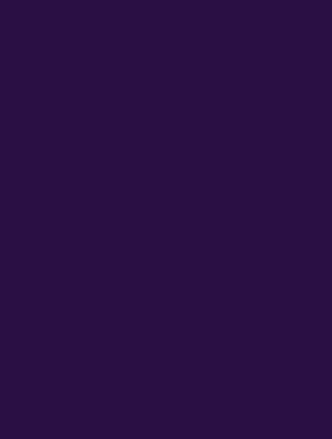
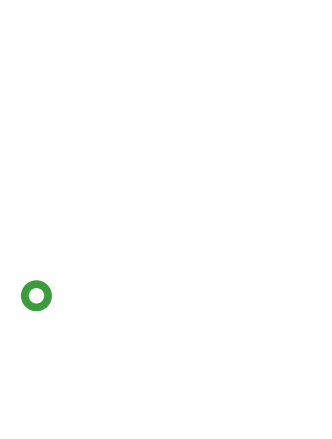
via: none -> (36, 295)

